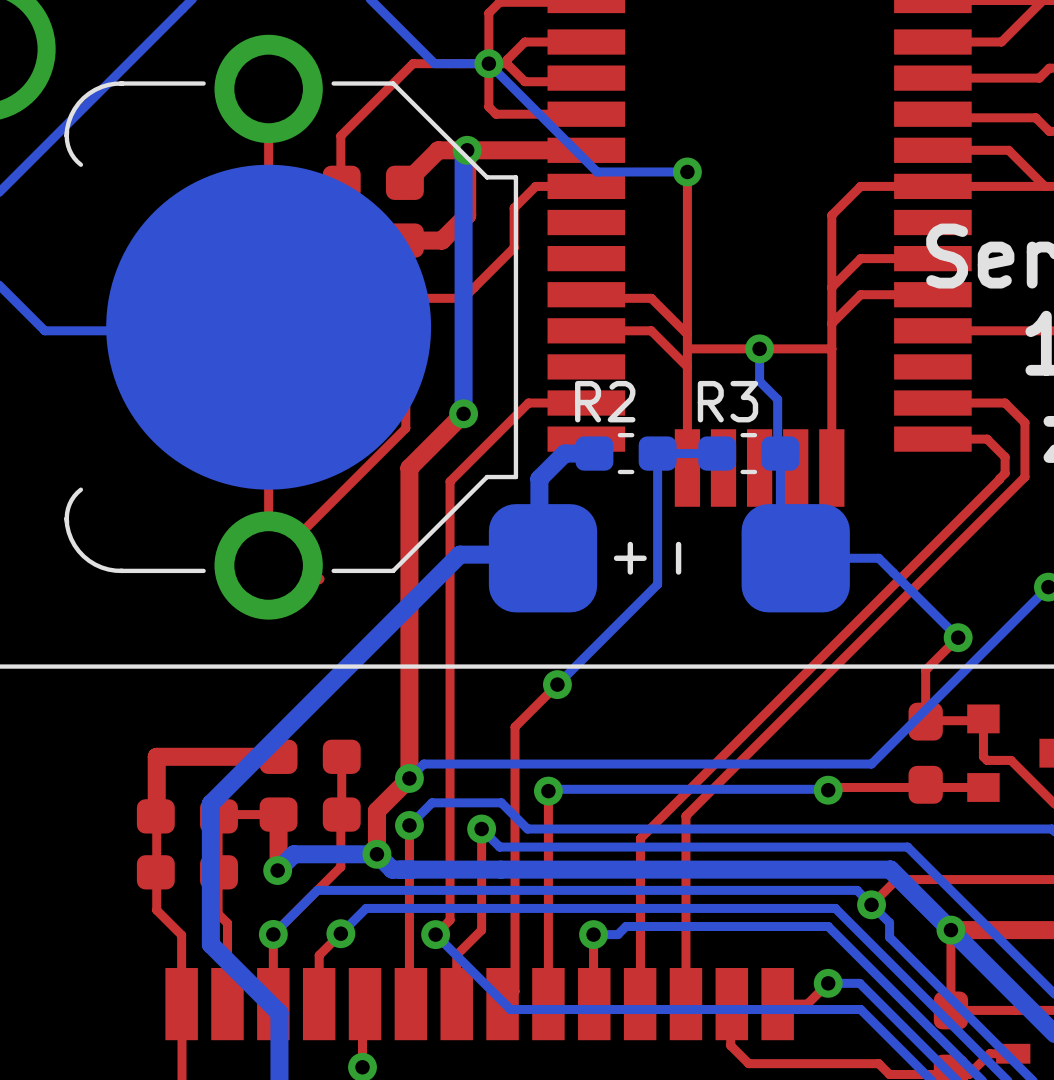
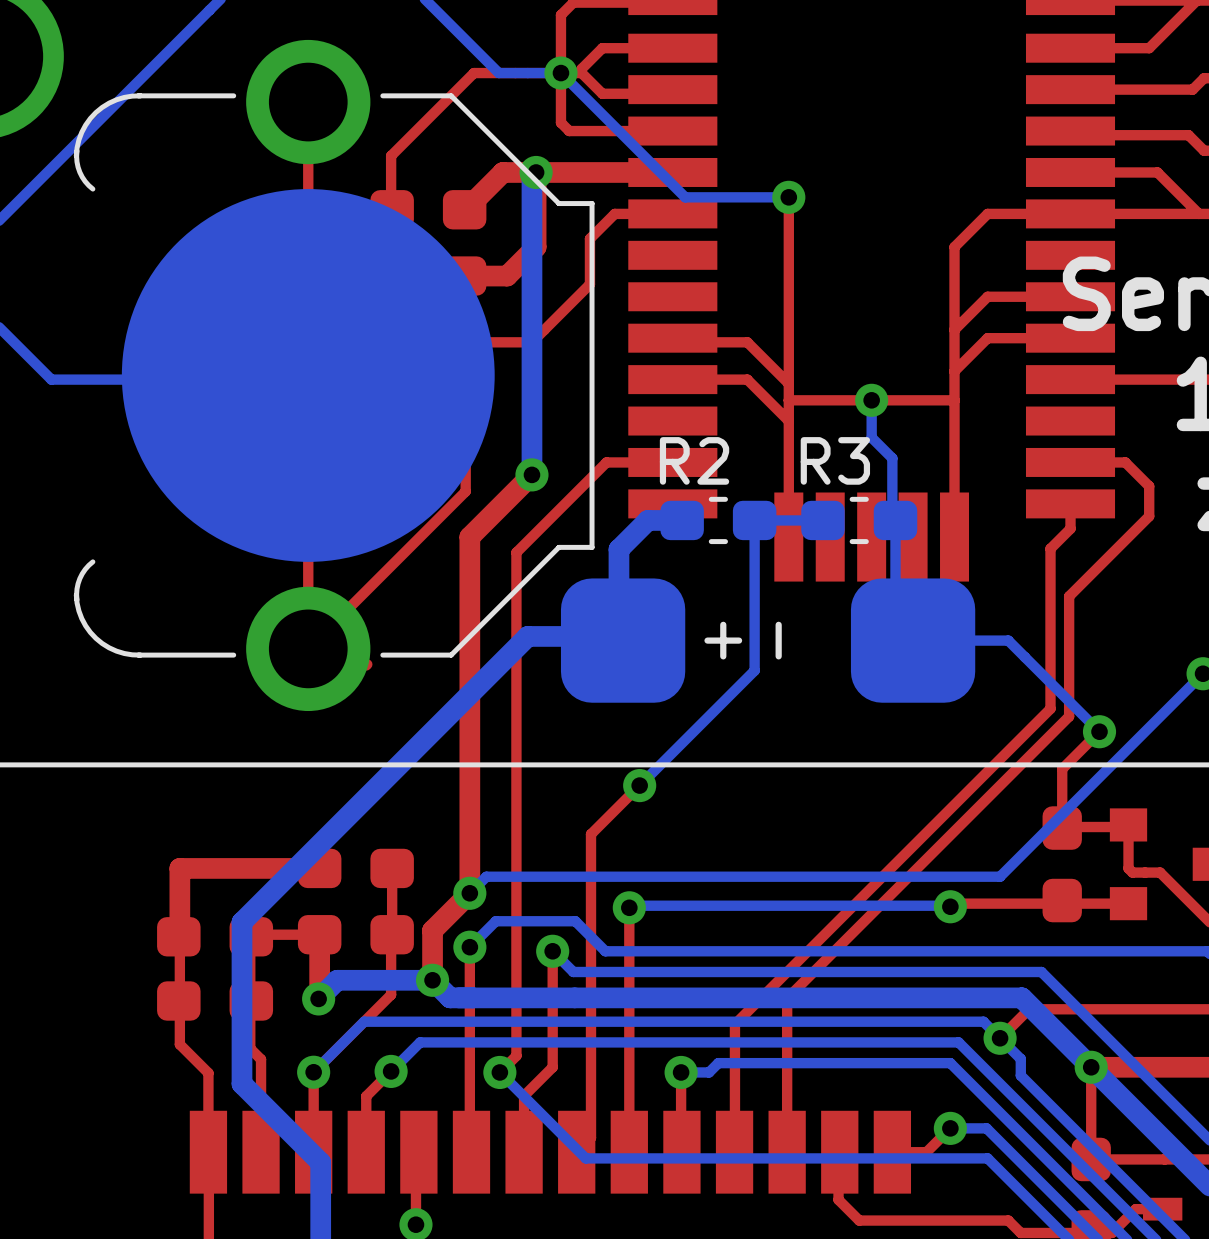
top track: (980, 403) (1005, 403) (1024, 422) (1024, 477) (685, 816) (685, 870) -> (1125, 462) (1149, 486) (1149, 516) (1069, 596) (1069, 716) (787, 998)
top track: (932, 439) (987, 439) (1005, 457) (1005, 473) (999, 478) -> none
top track: (999, 479) (640, 838) (640, 892) -> (1070, 503) (1070, 528) (1050, 548) (1050, 708) (734, 1024)

